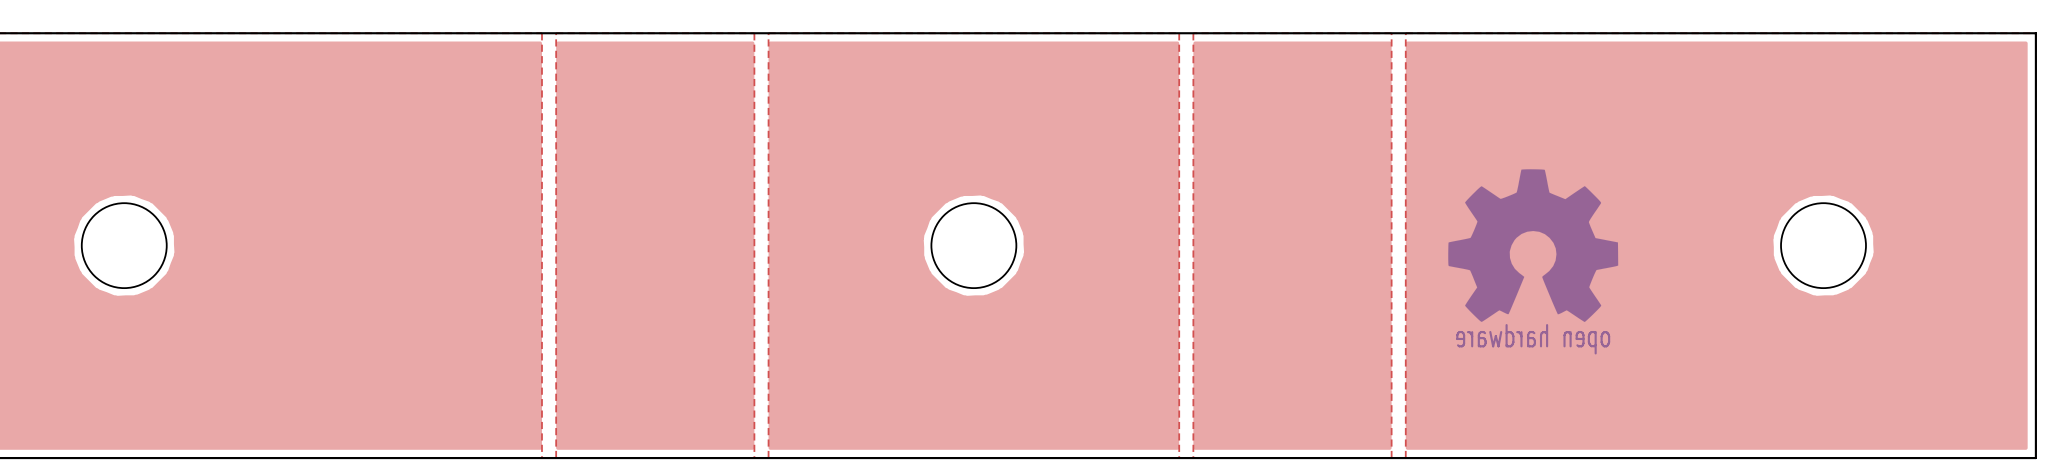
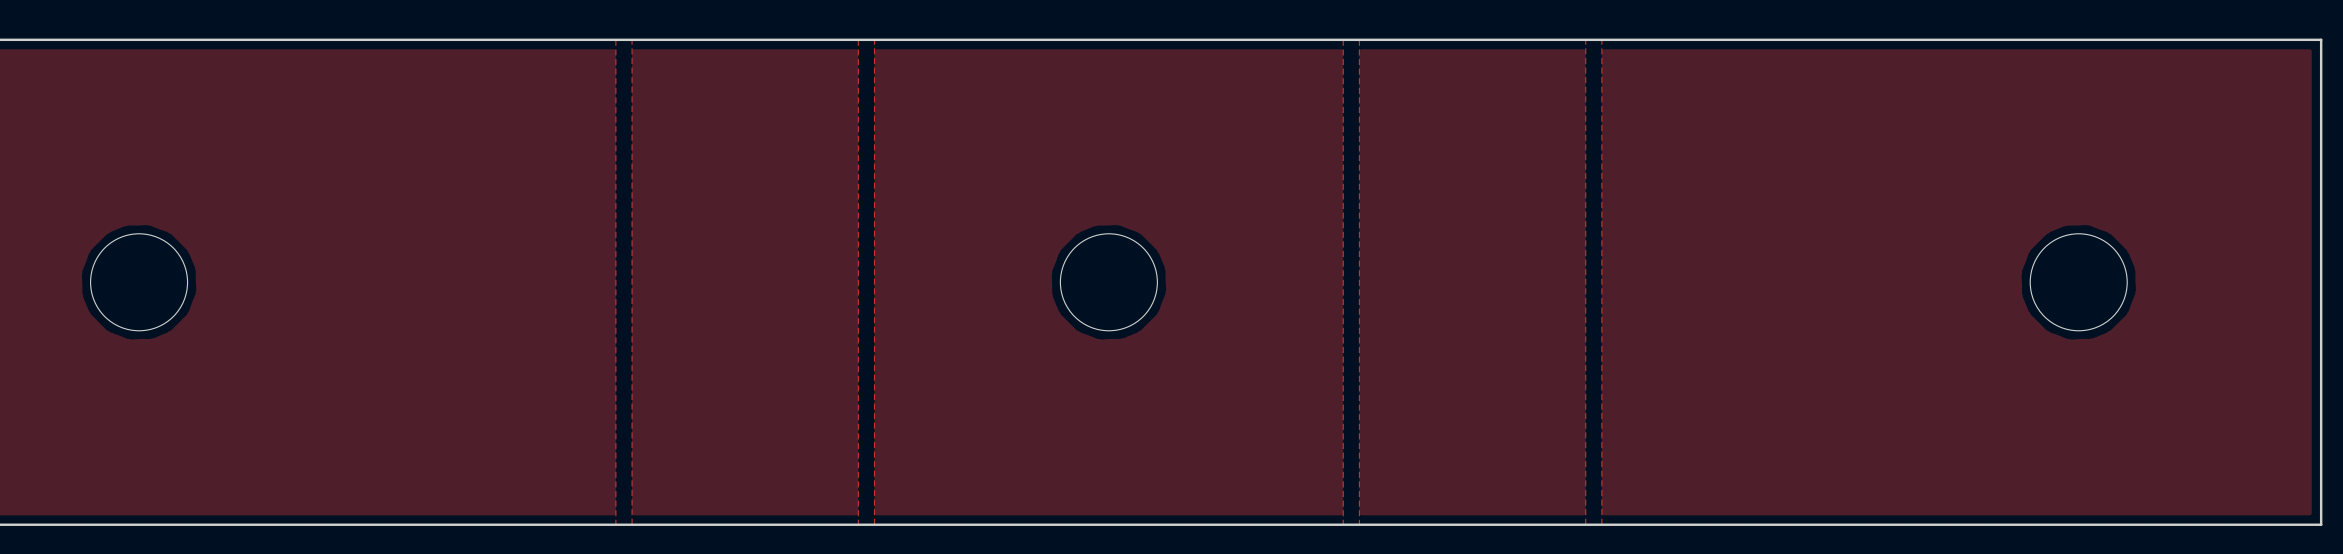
drawing: [1448, 169, 1619, 355] -> none

